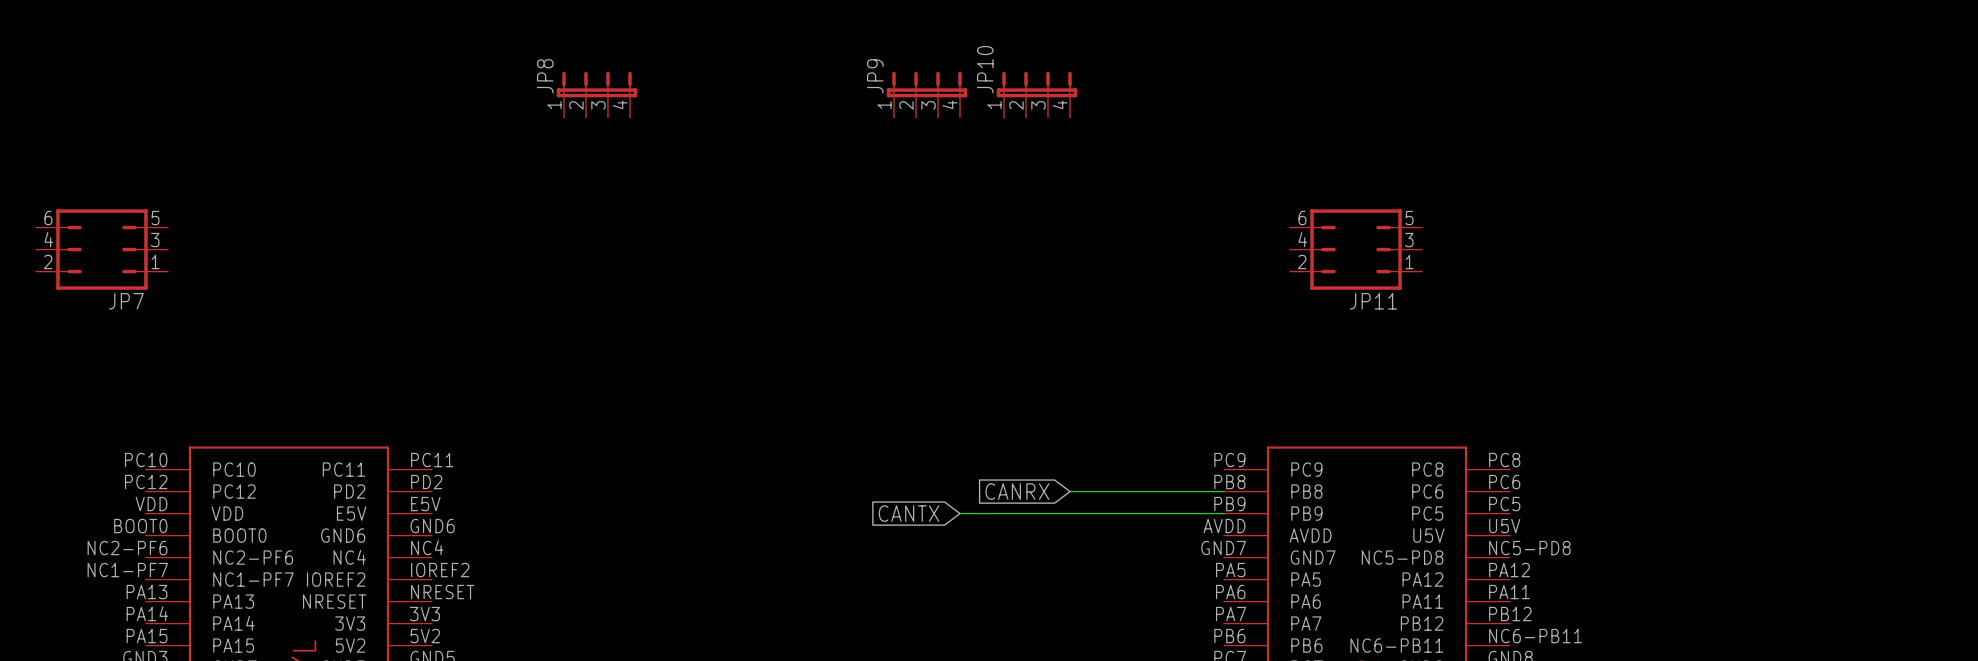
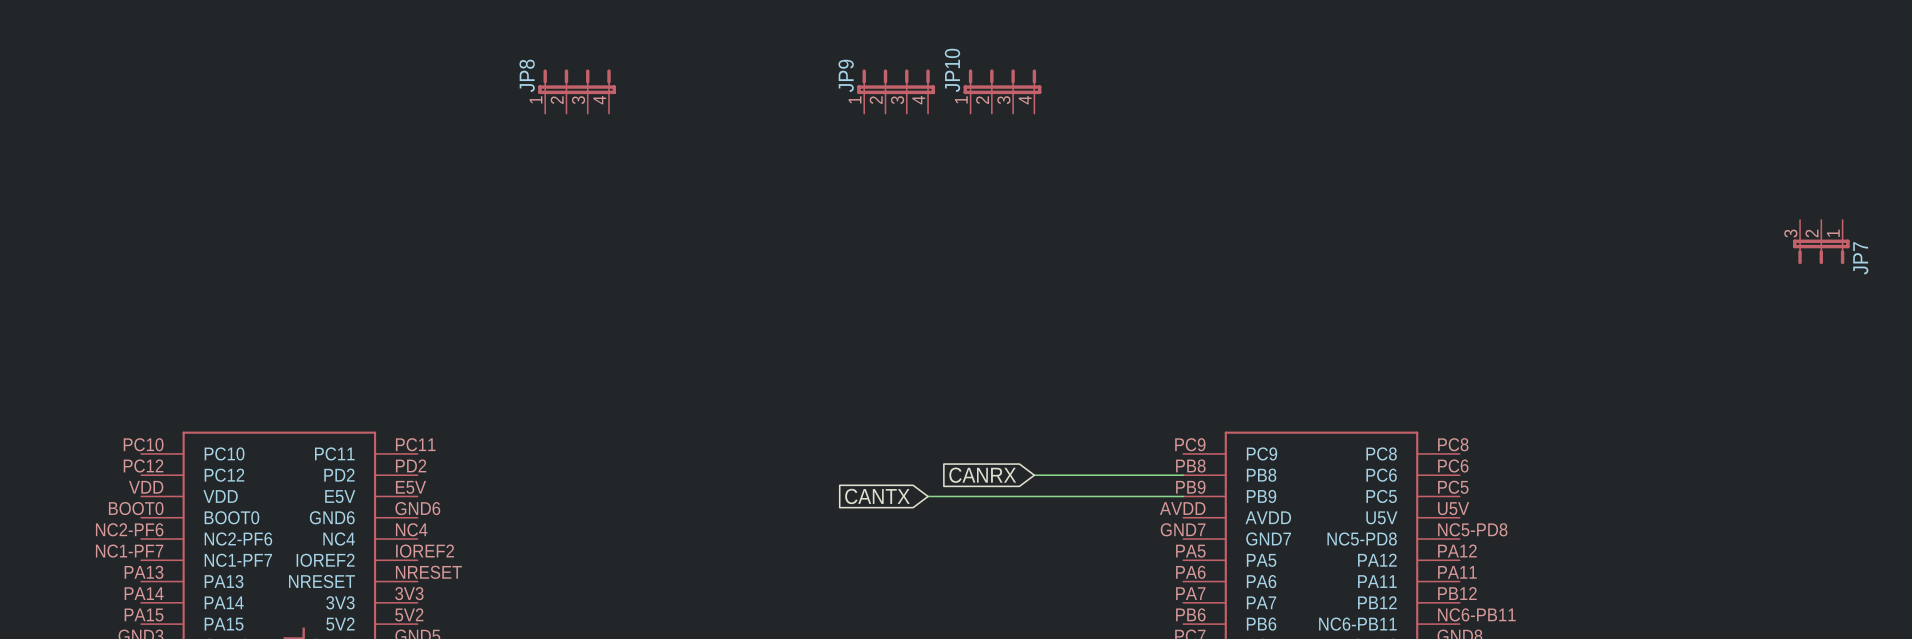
JP7 symbol: [35, 209, 168, 290] -> [1793, 219, 1850, 265]
JP11: (1356, 249) -> none
JP7 name position: JP7 (126, 301) -> JP7 (1860, 258)

